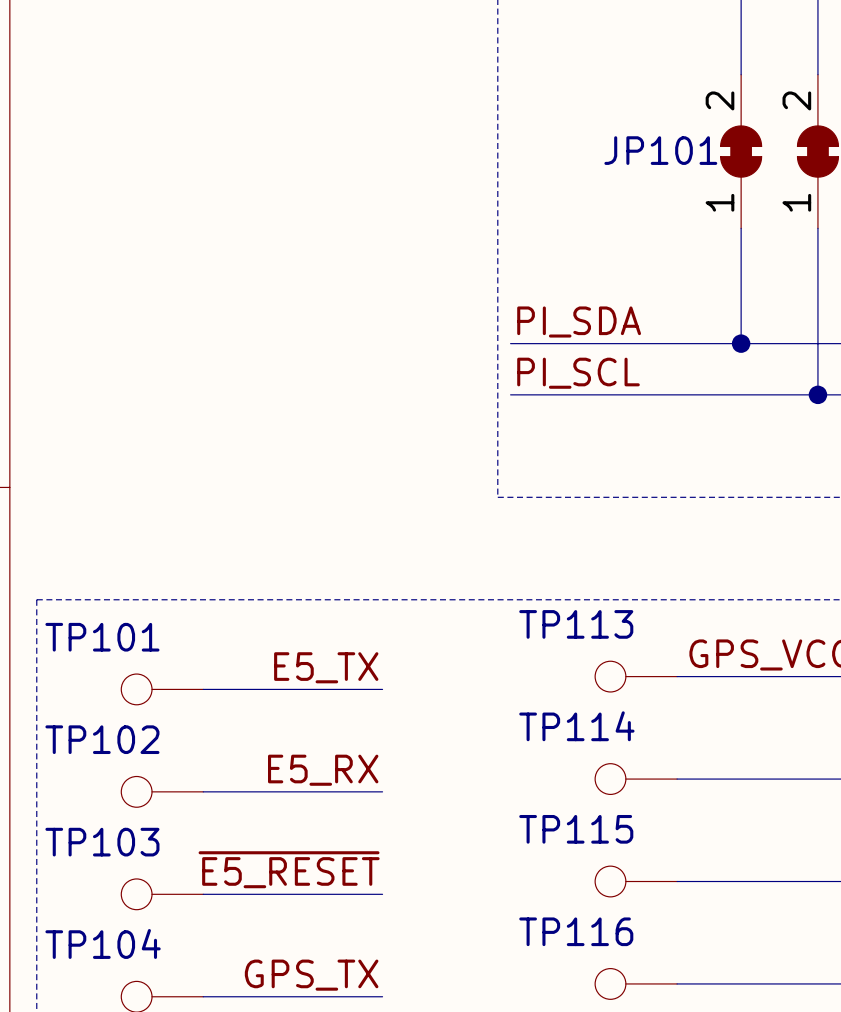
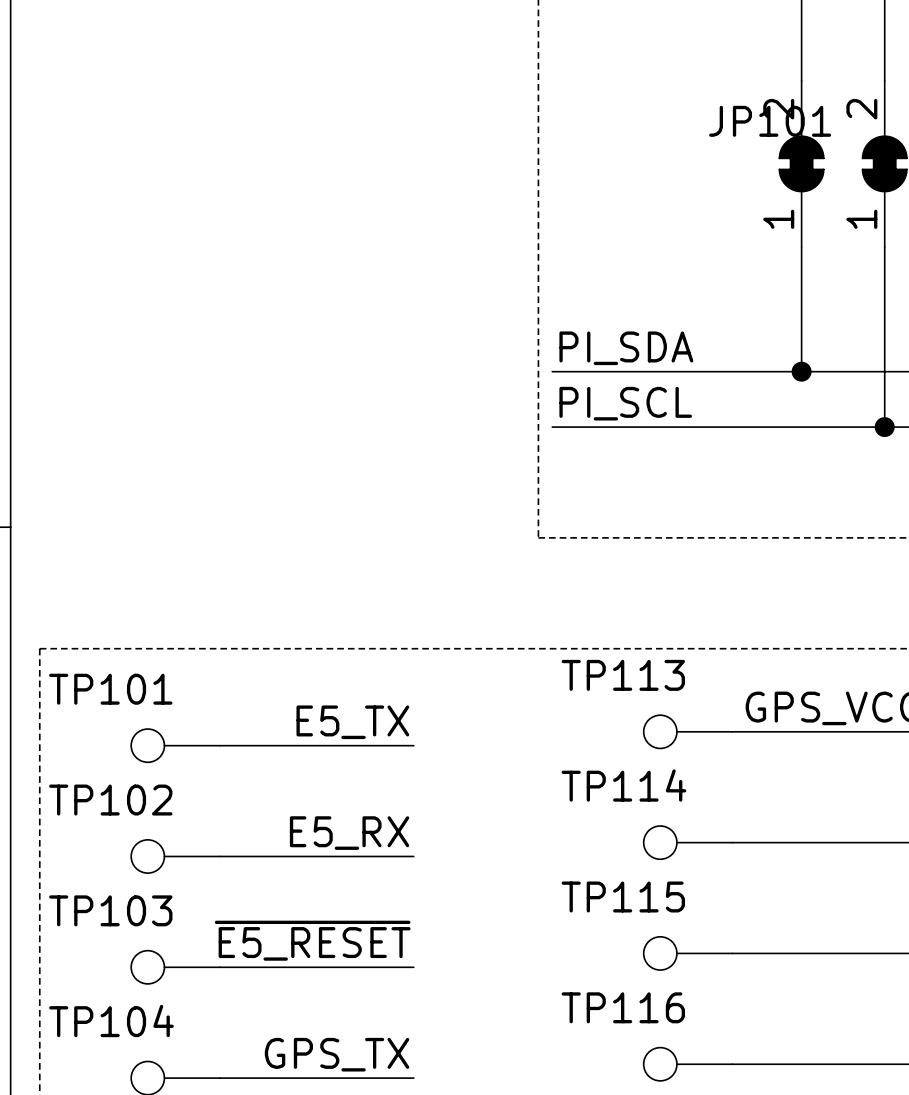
JP101 name position: JP101 (660, 150) -> JP101 (770, 121)

